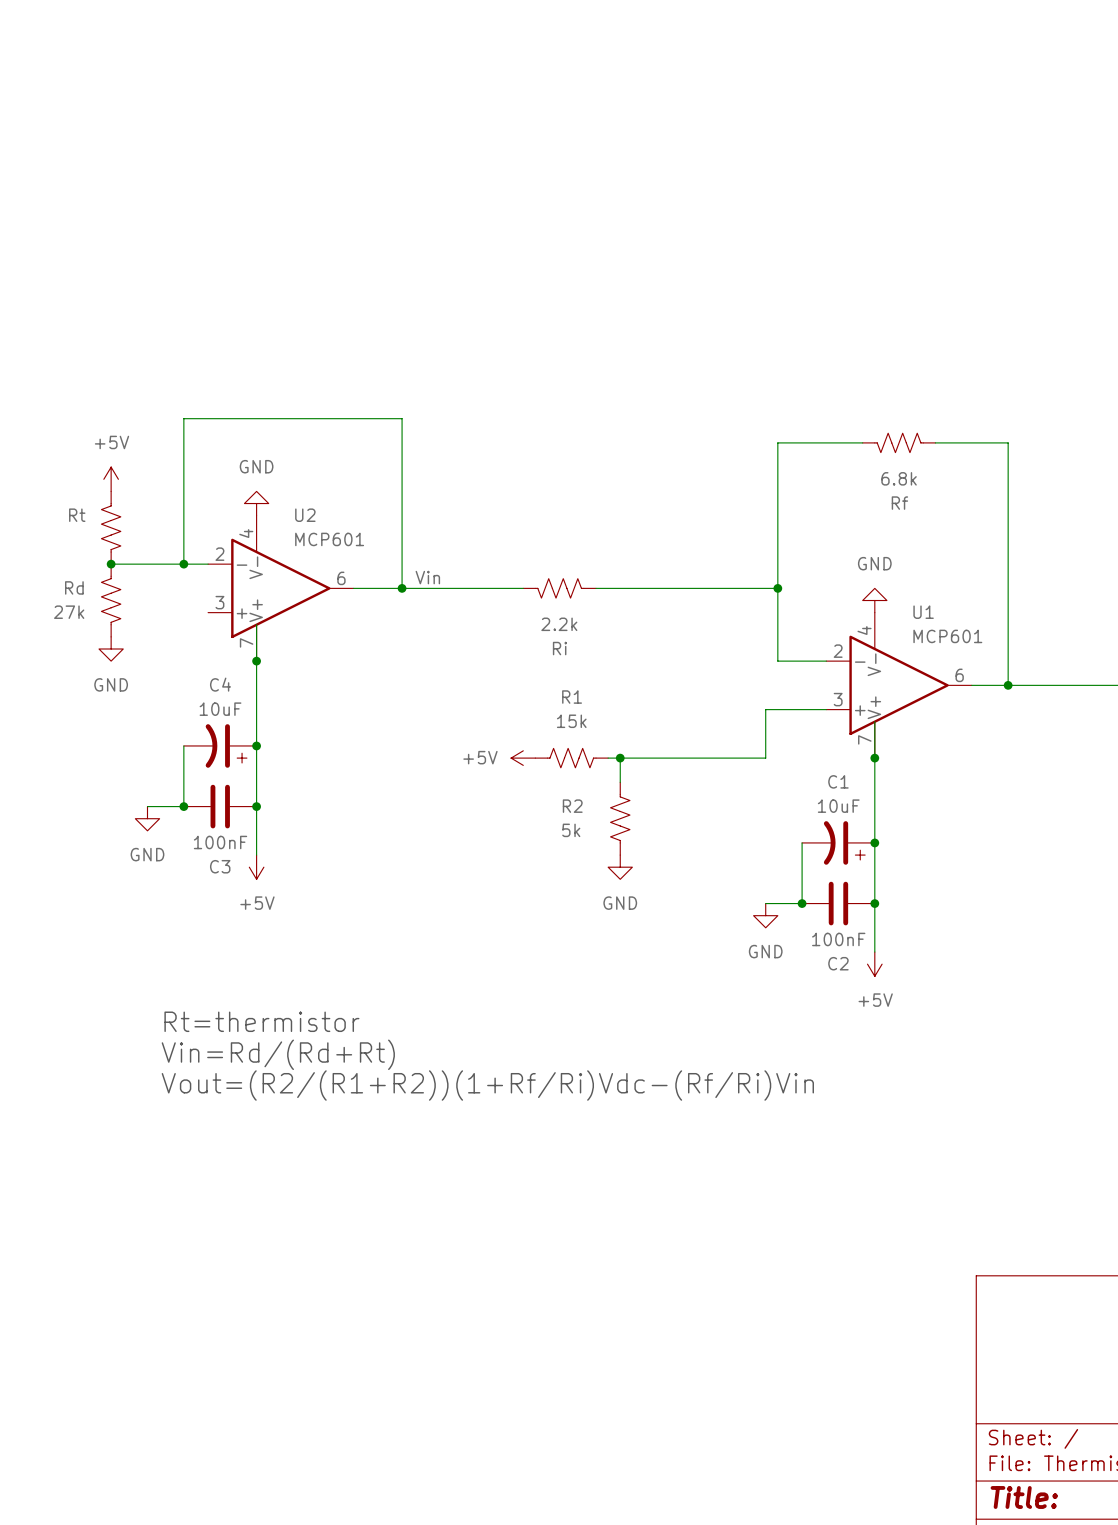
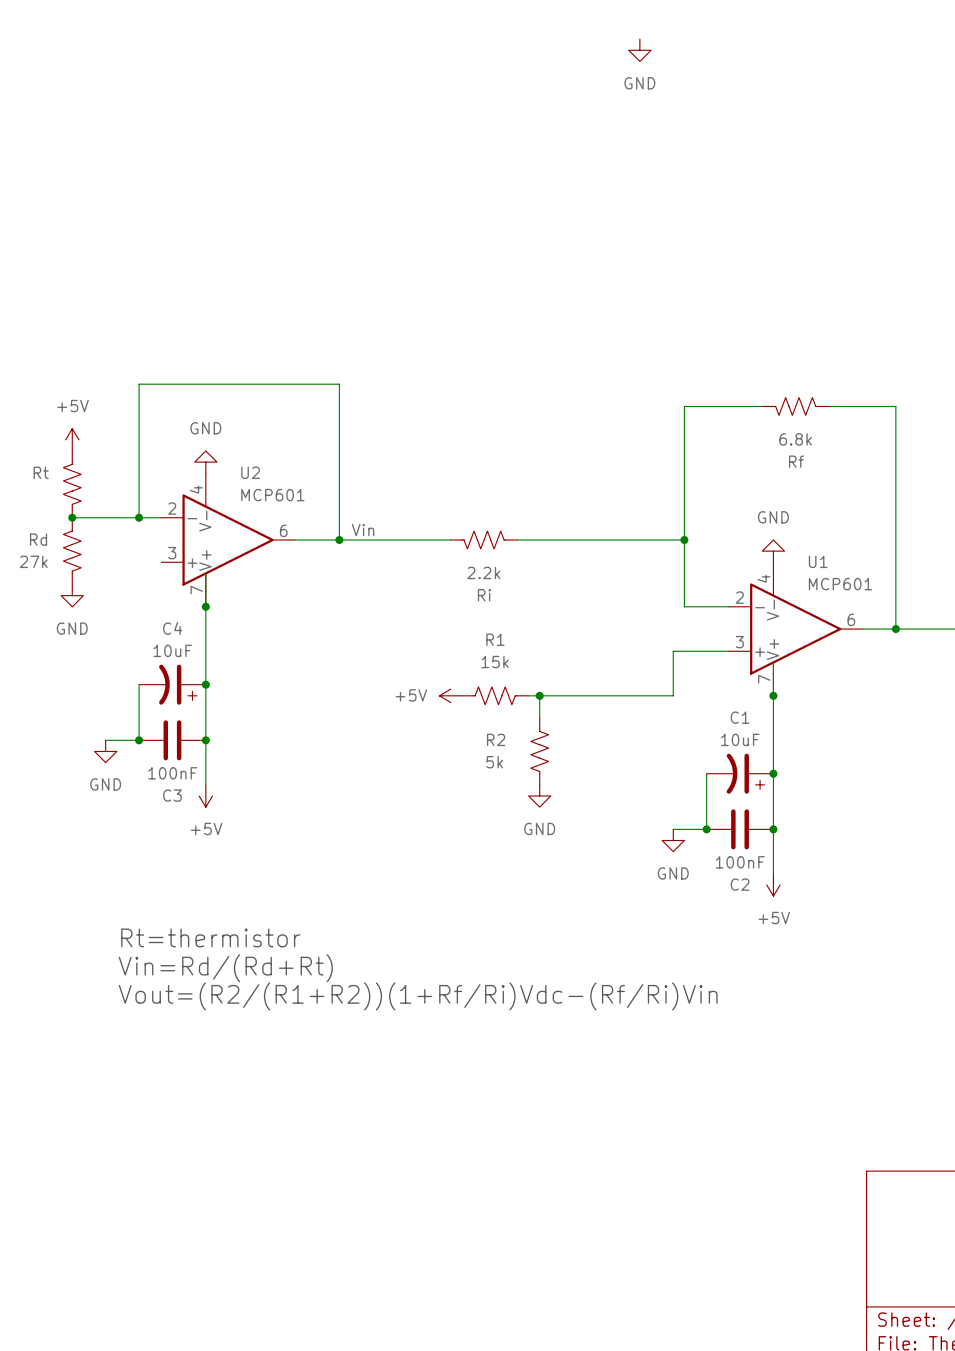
power symbol: none -> GND (639, 50)

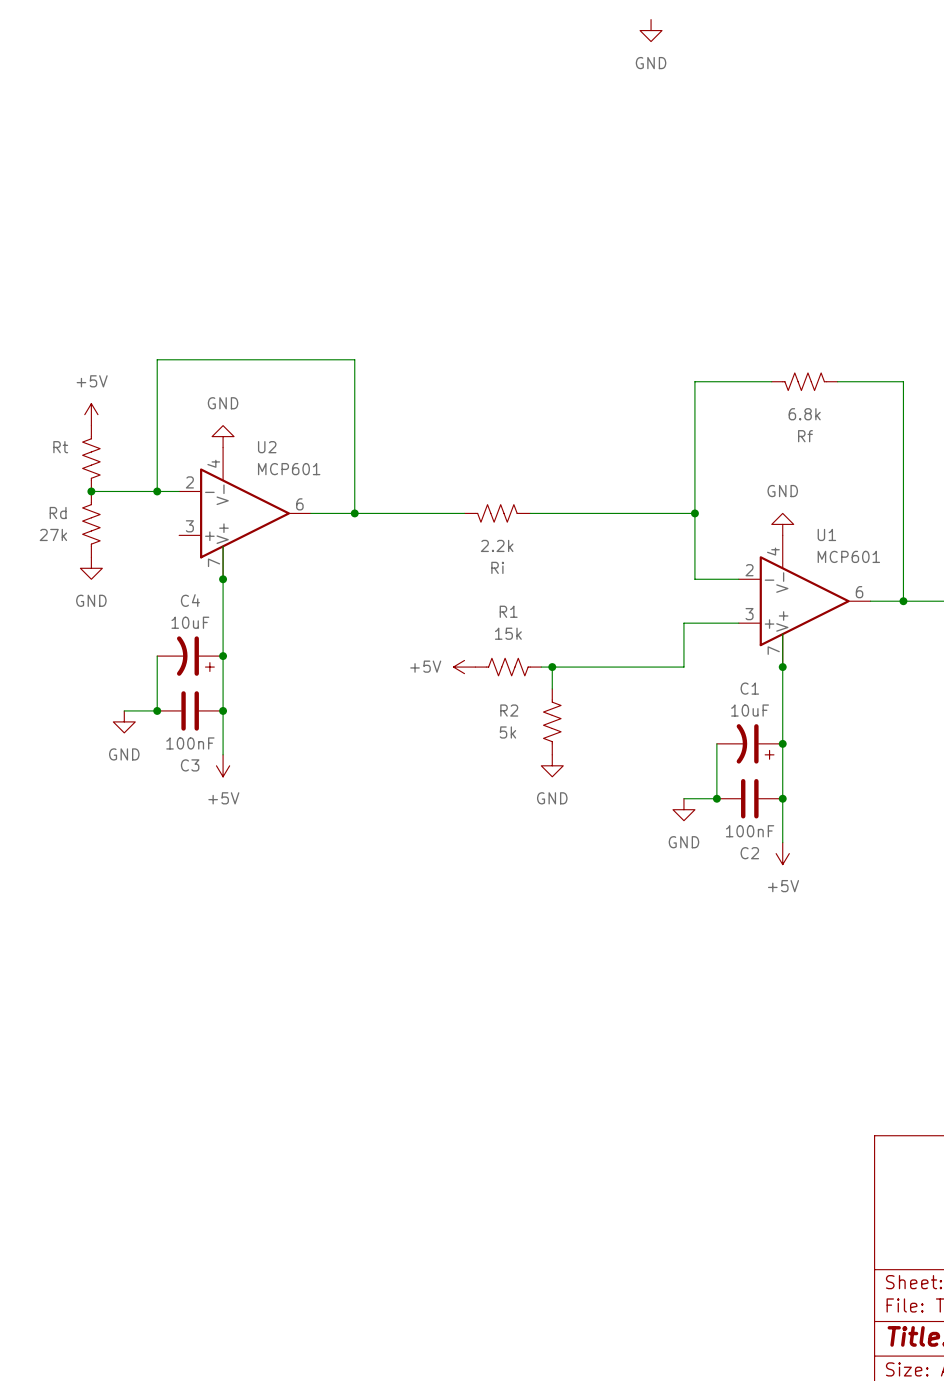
label: Vin (363, 530) -> none
text: Rt=thermistor (210, 937) -> none
text: Vin=Rd/(Rd+Rt) (225, 968) -> none
text: Vout=(R2/(R1+R2))(1+Rf/Ri)Vdc-(Rf/Ri)Vin (418, 996) -> none

